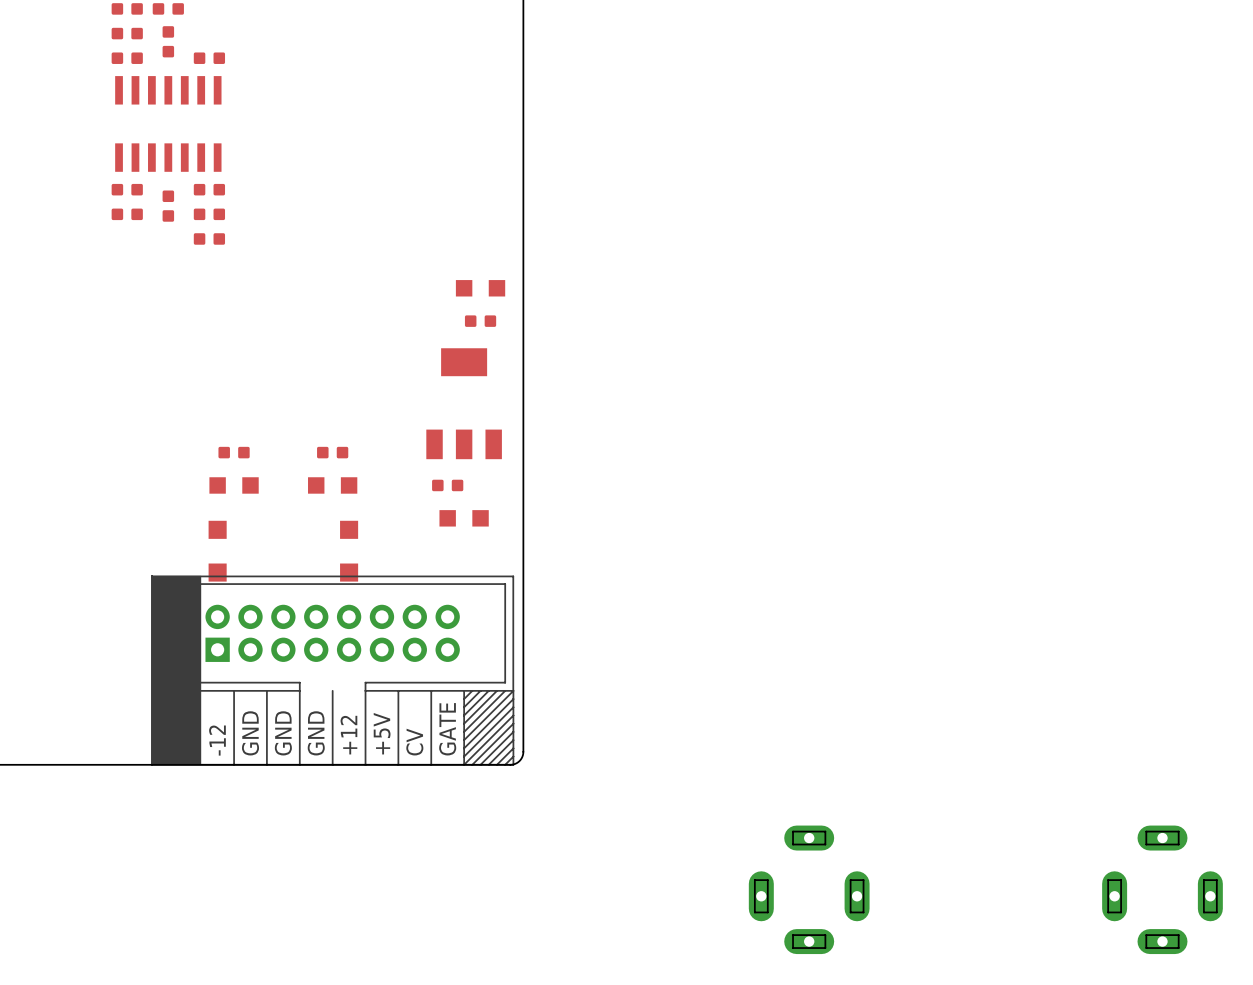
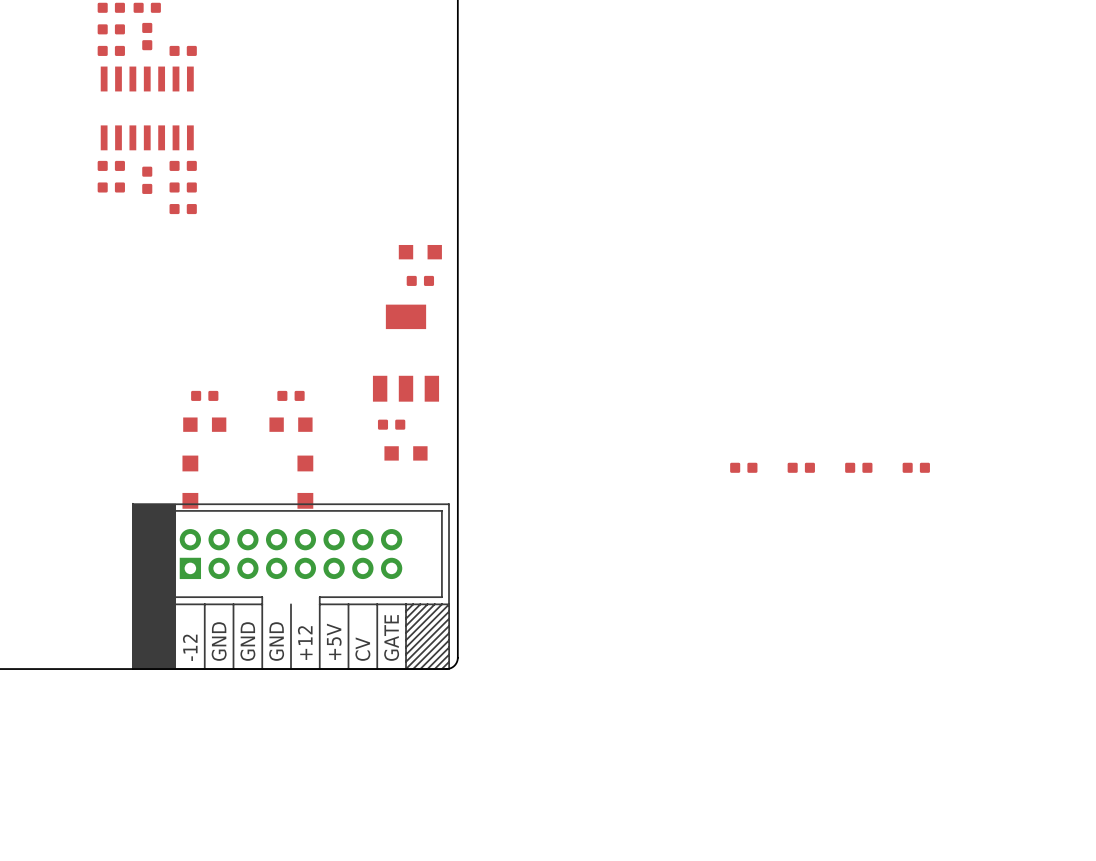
part: none -> (743, 467)
part: none -> (801, 467)
part: none -> (858, 467)
part: none -> (916, 467)
part: (809, 889) -> none
part: (1162, 889) -> none

